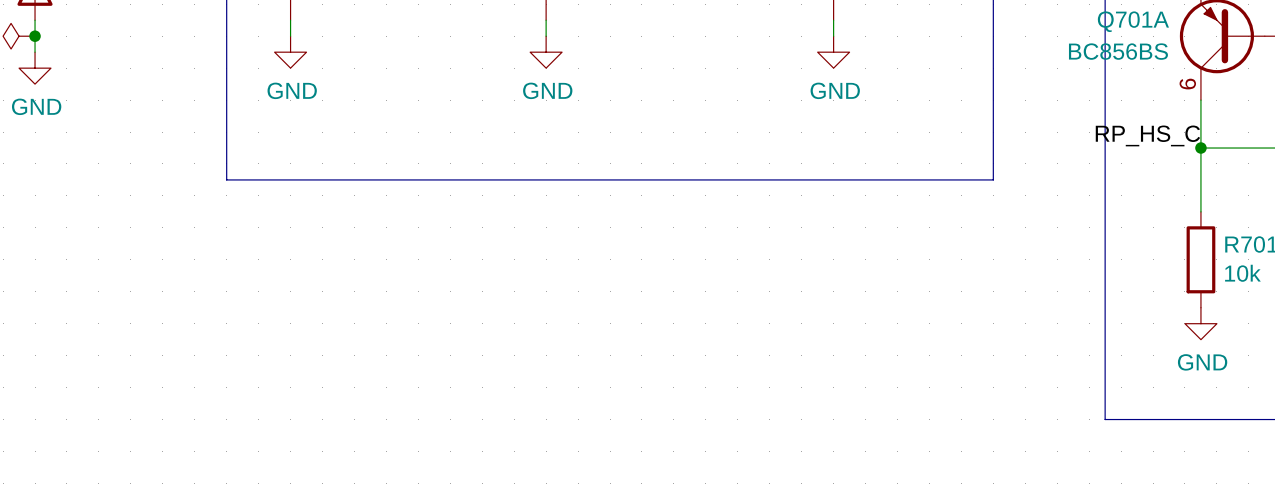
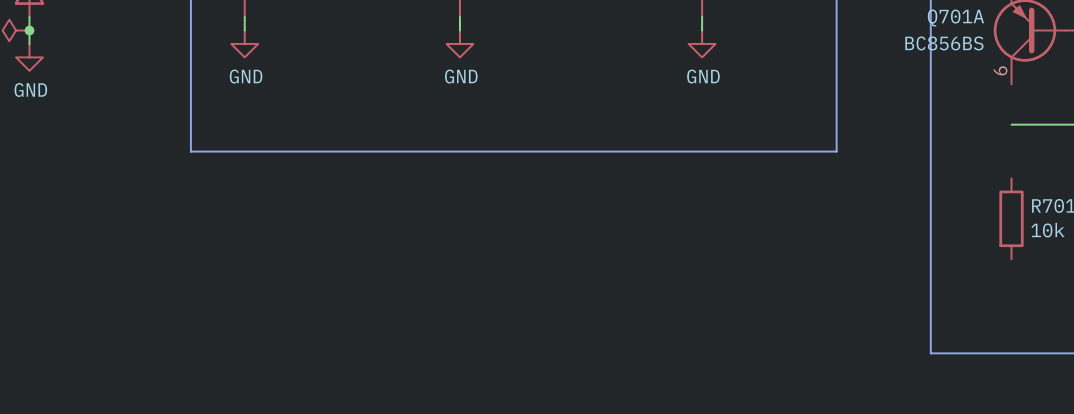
wire: (1200, 100) (1200, 211) -> none
label: RP_HS_C (1147, 135) -> none
junction: (1200, 148) -> none
power symbol: GND (1200, 323) -> none

